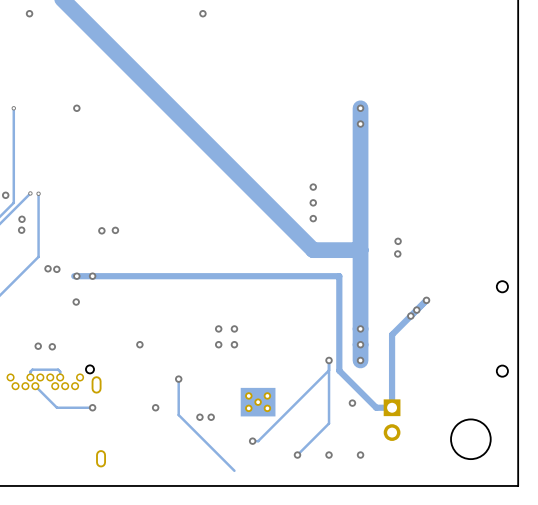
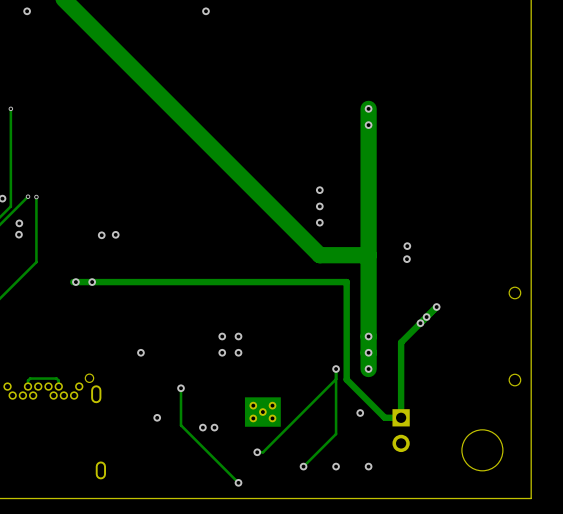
via: (76, 108) -> none
via: (48, 268) -> none
via: (56, 269) -> none
via: (76, 302) -> none
via: (38, 346) -> none
via: (52, 346) -> none
track: (35, 386) (56, 407) (92, 407) -> none
via: (92, 407) -> none
via: none -> (238, 482)

